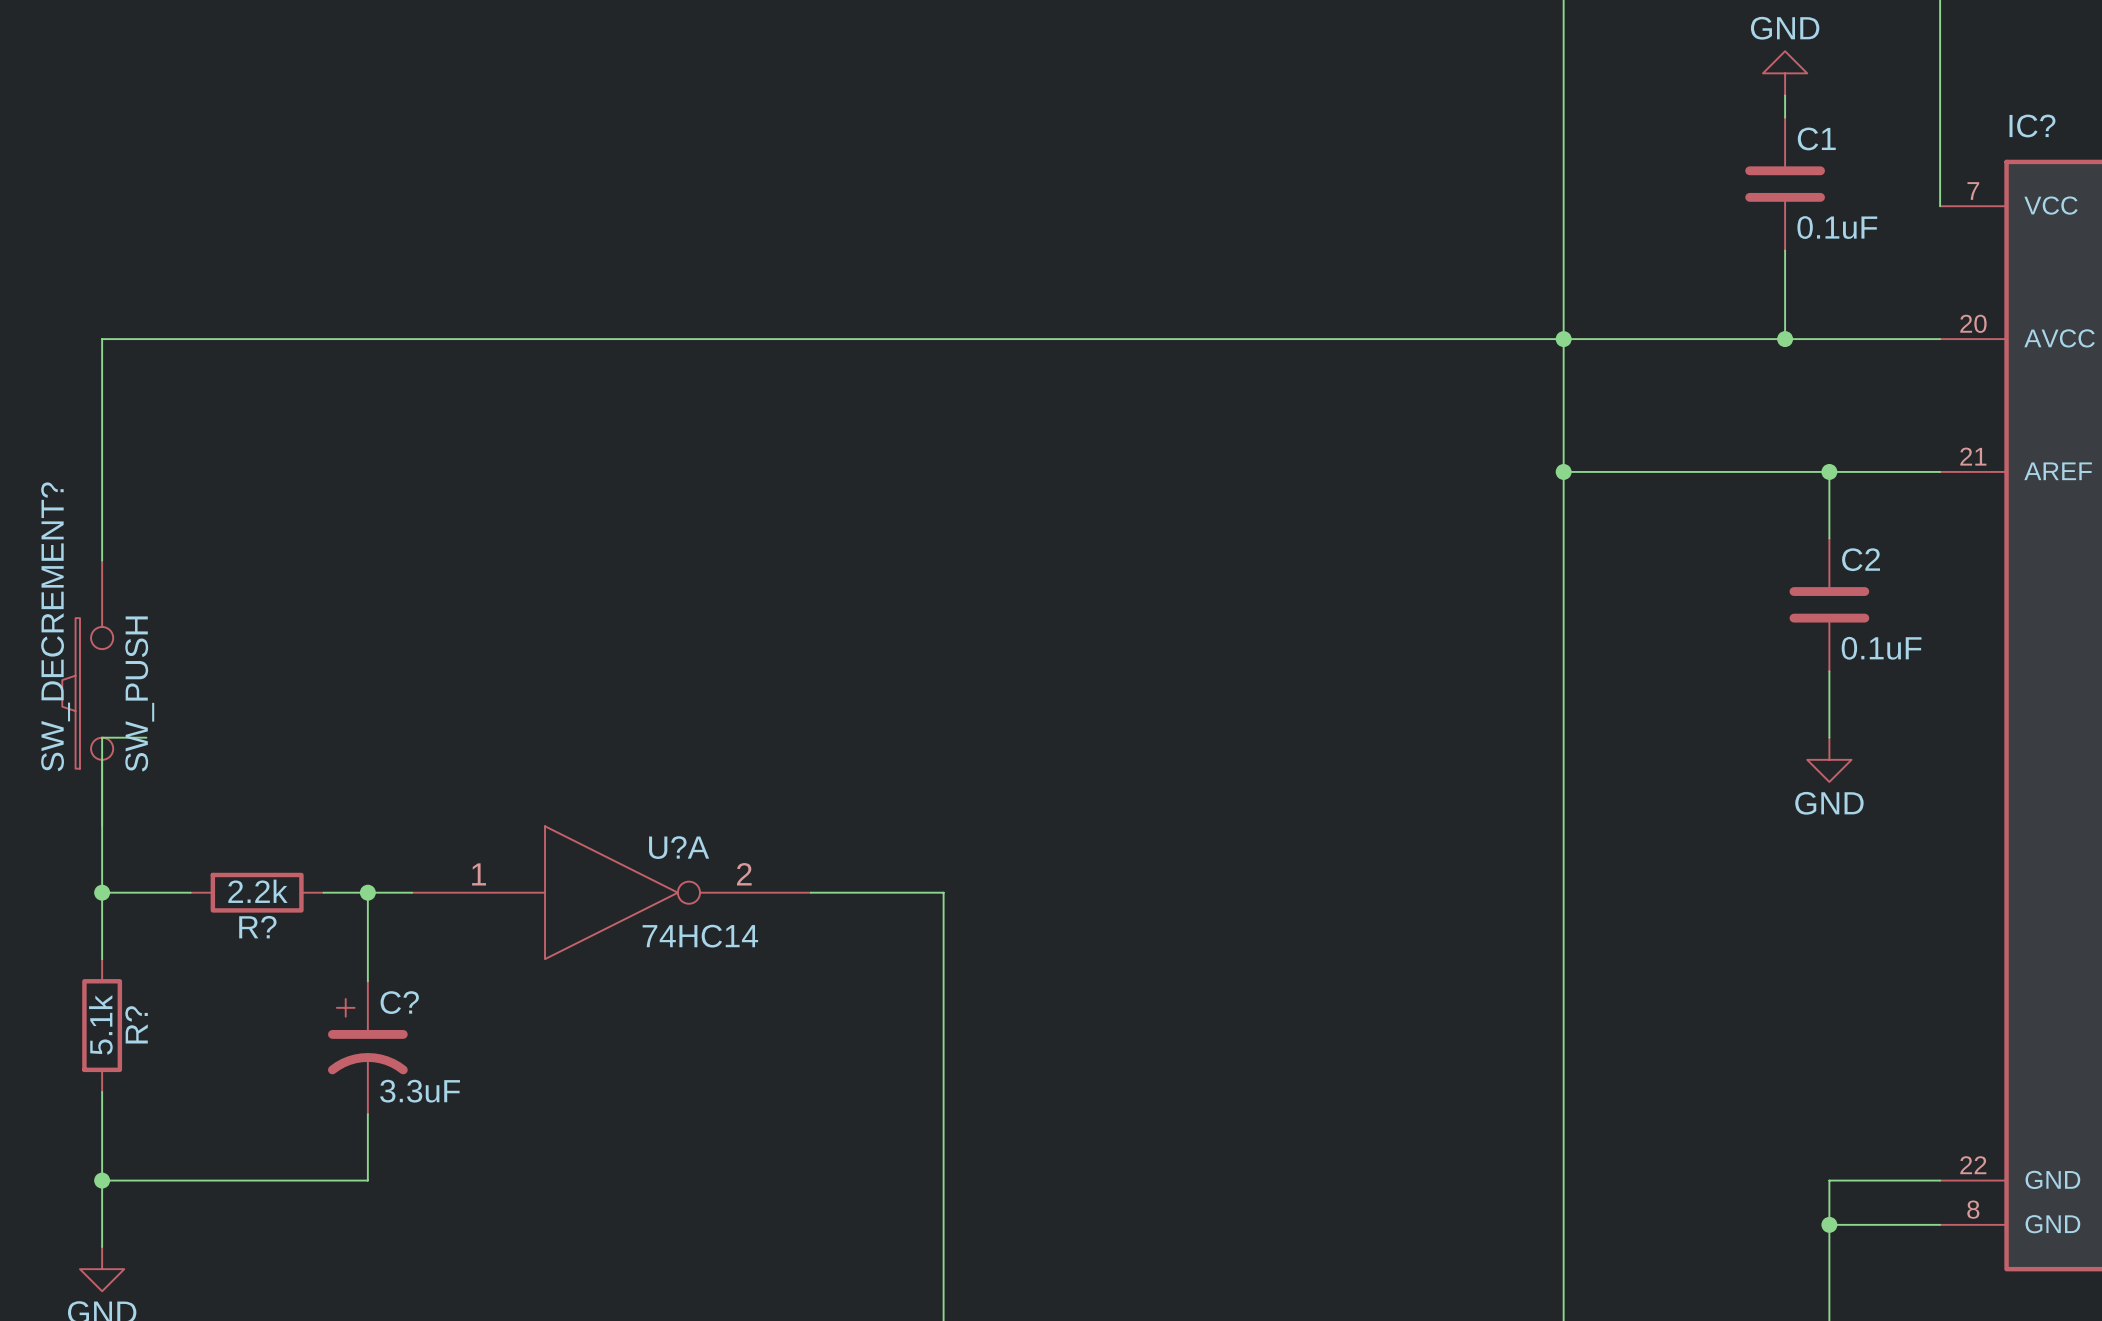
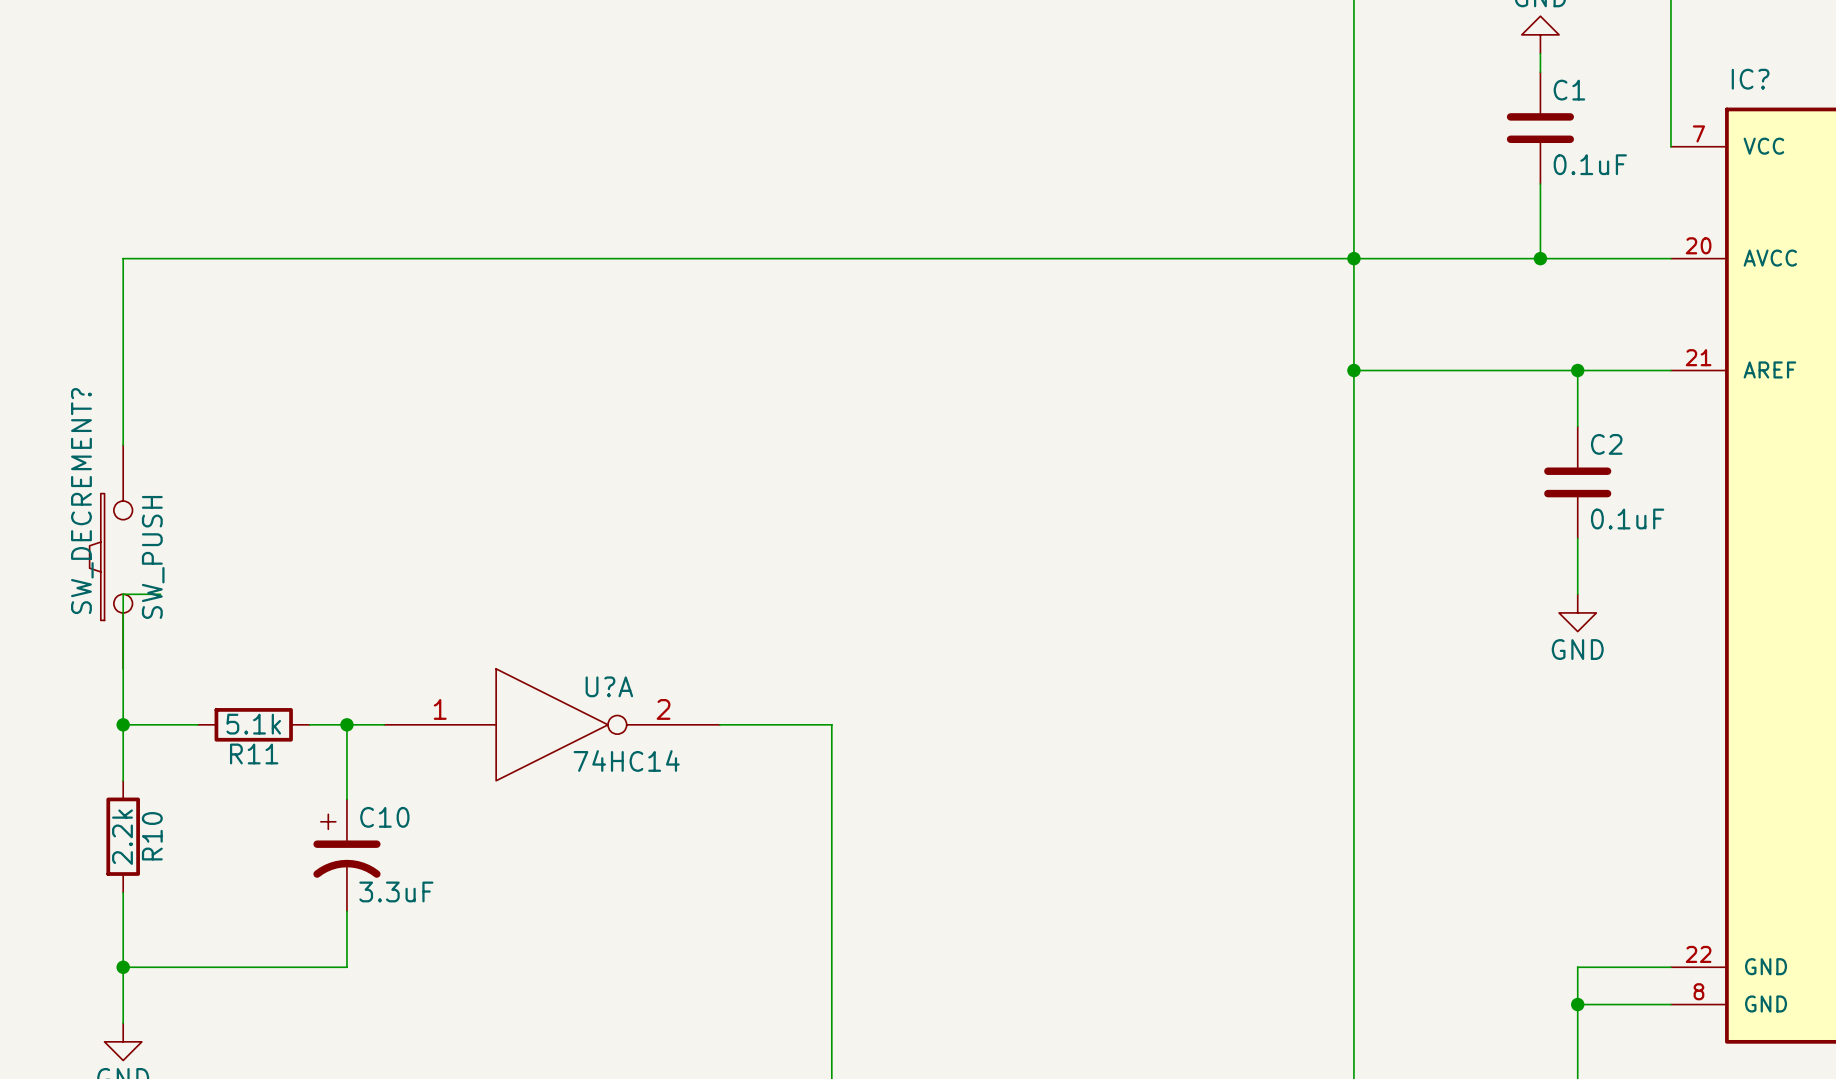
R? value: 2.2k (257, 891) -> 5.1k (253, 724)
R? name: R? (257, 927) -> R11 (254, 753)
C? name: C? (399, 1002) -> C10 (384, 817)
R? value: 5.1k (100, 1024) -> 2.2k (122, 837)
R? name: R? (136, 1024) -> R10 (152, 836)

